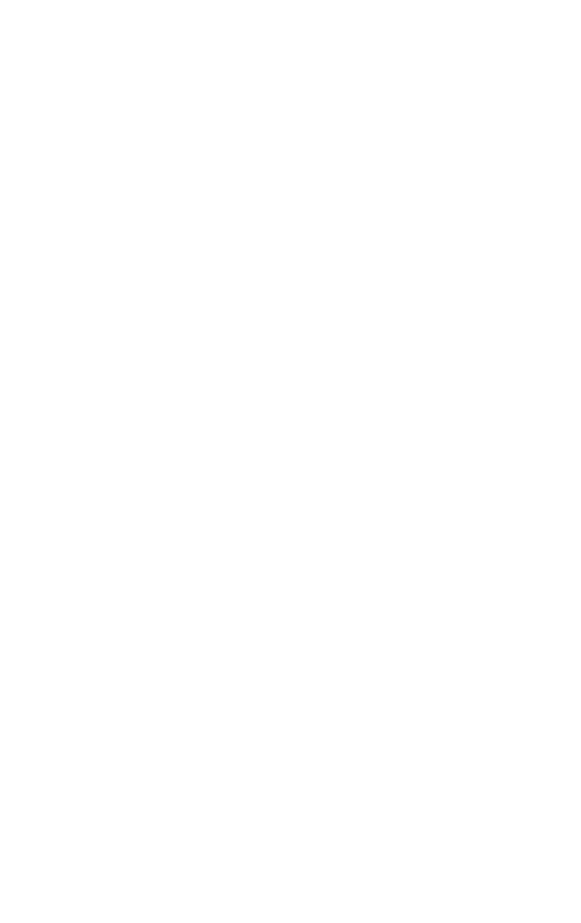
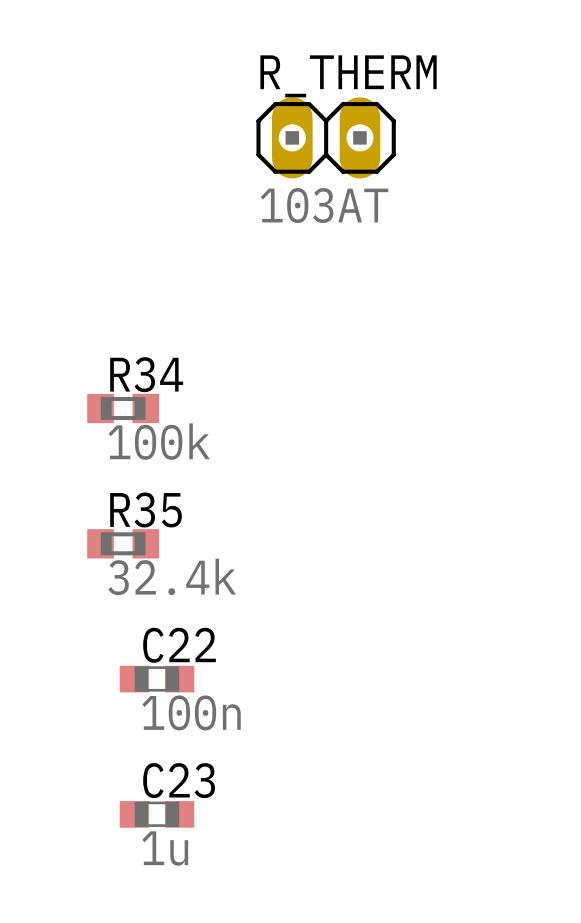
R_THERM: none -> 103AT (326, 137)
R34: none -> 100k (123, 408)
R35: none -> 32.4k (123, 543)
C22: none -> 100n (157, 679)
C23: none -> 1u (157, 814)

